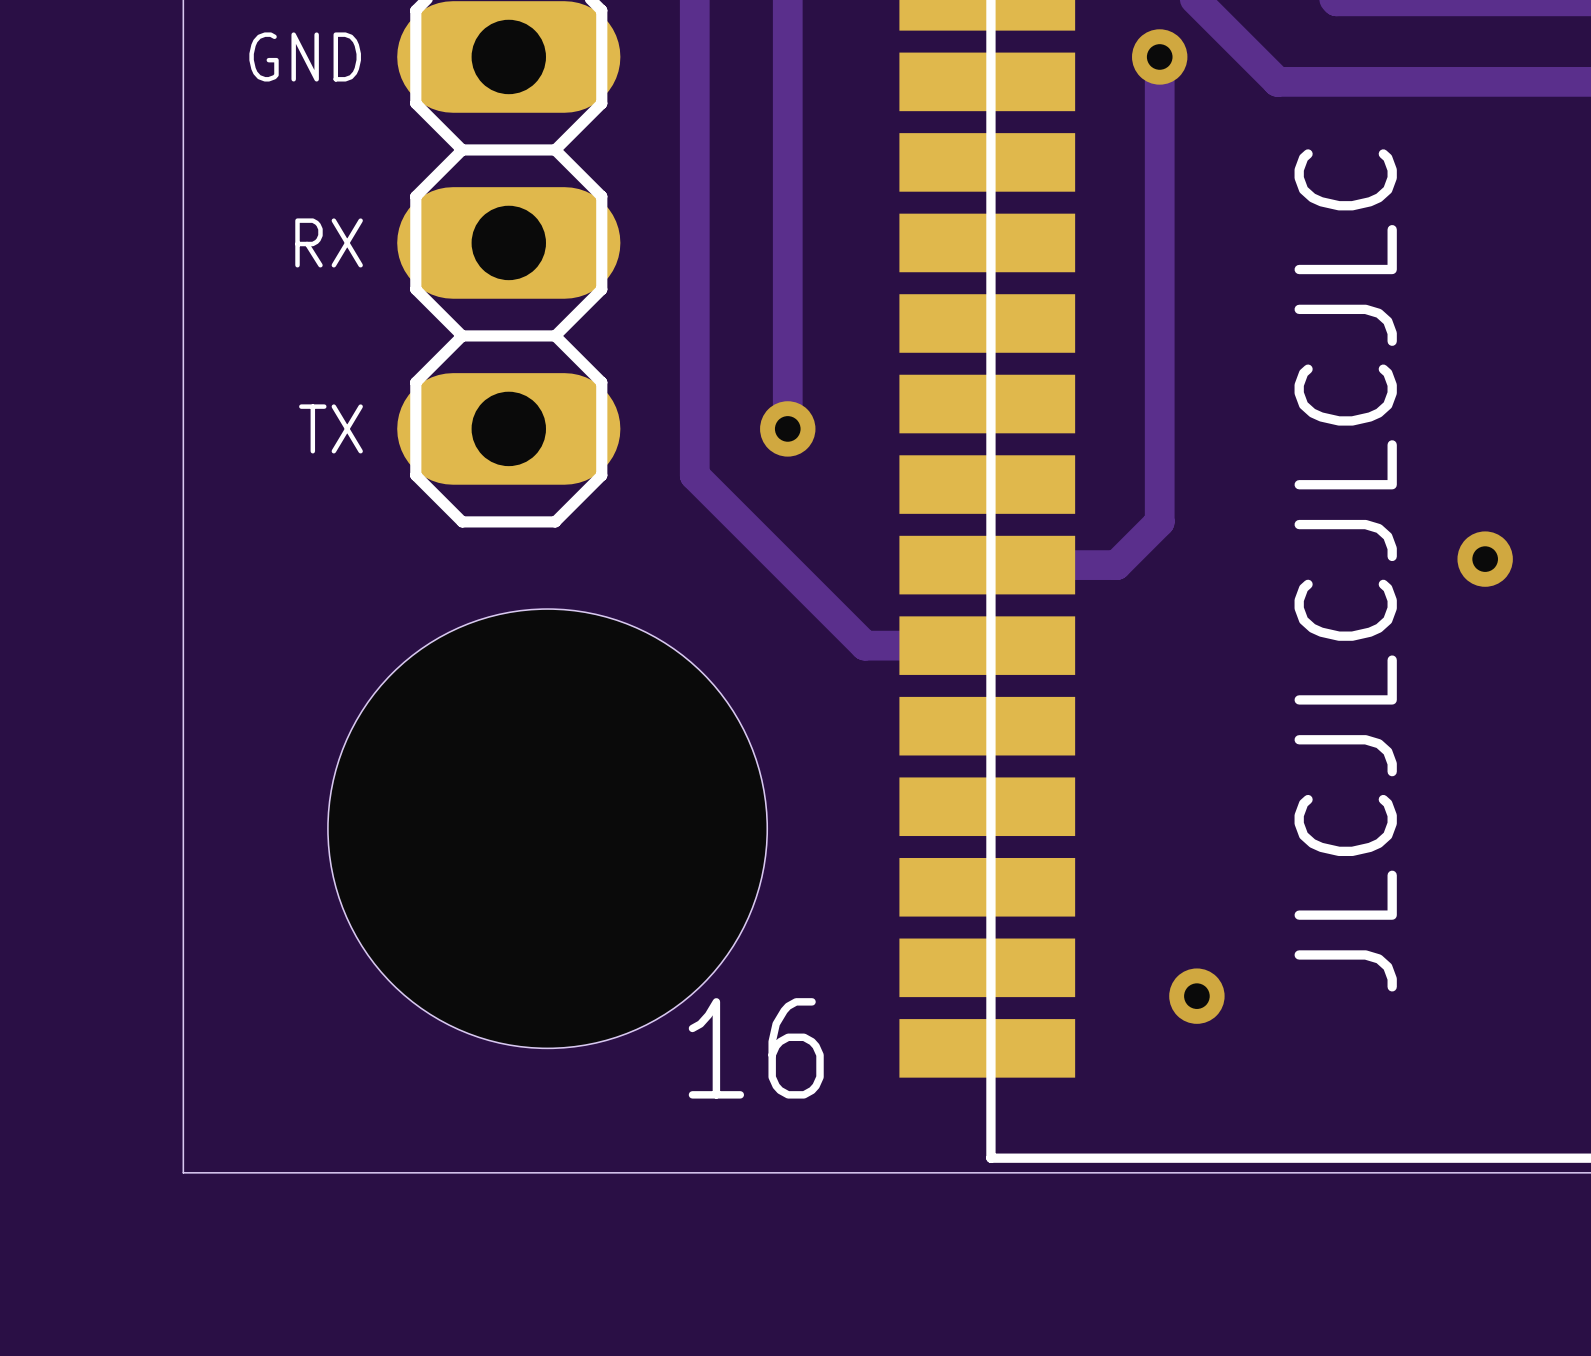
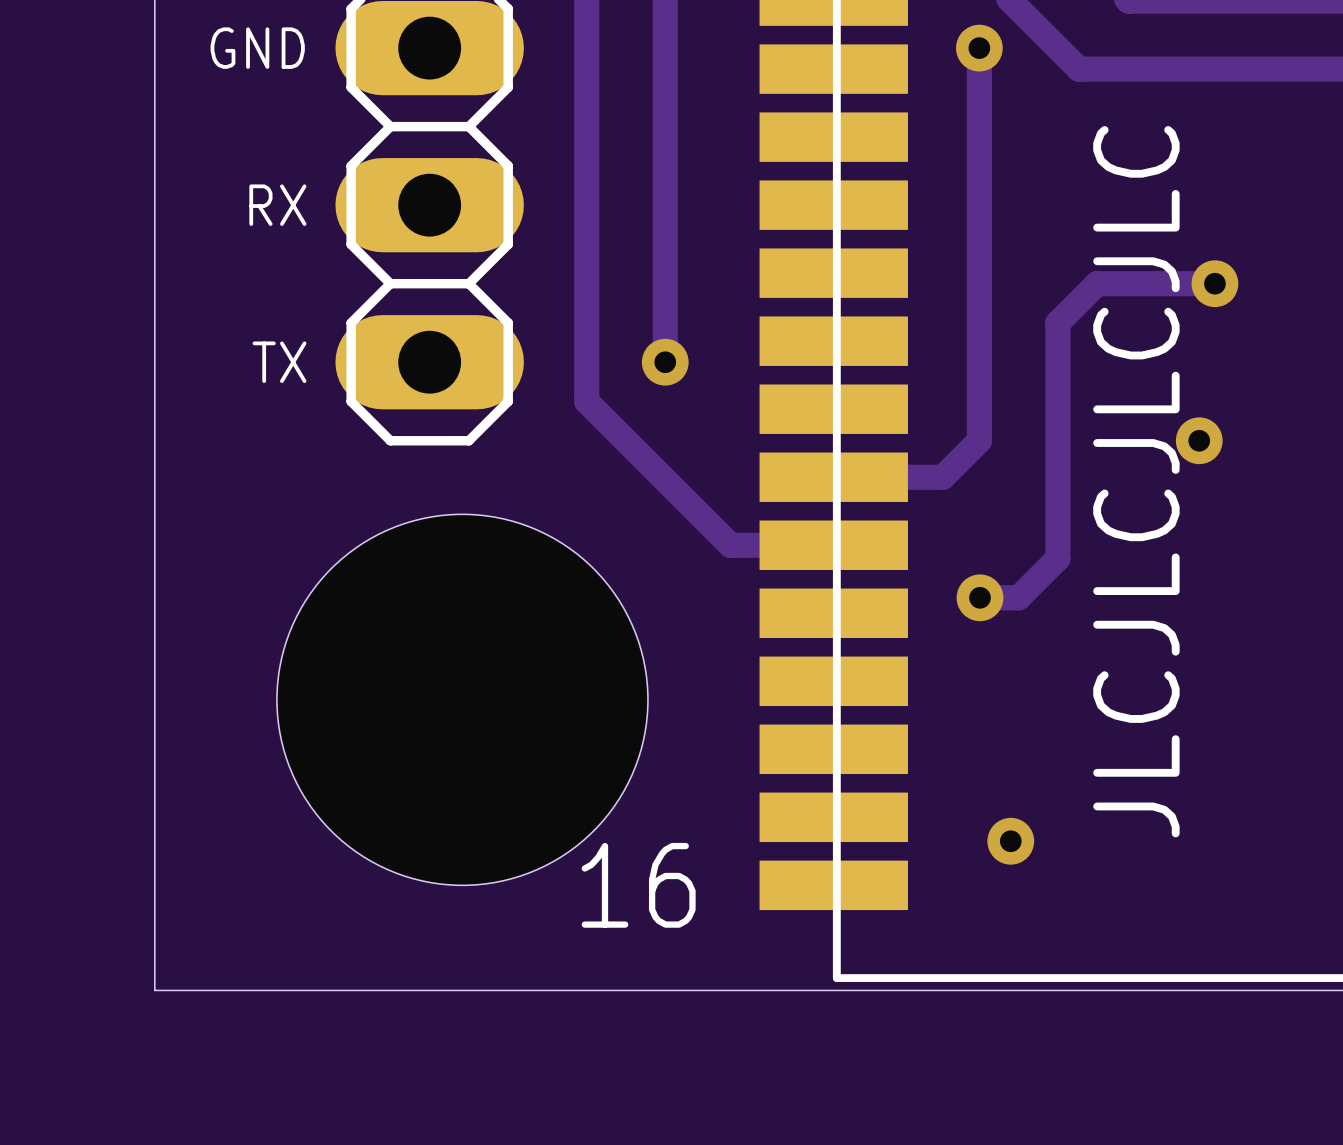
track: none -> (1214, 283) (1097, 283) (1057, 322) (1057, 558) (1018, 597) (980, 597)
via: none -> (1214, 283)
via position: (1485, 559) -> (1199, 440)
via: none -> (980, 597)

